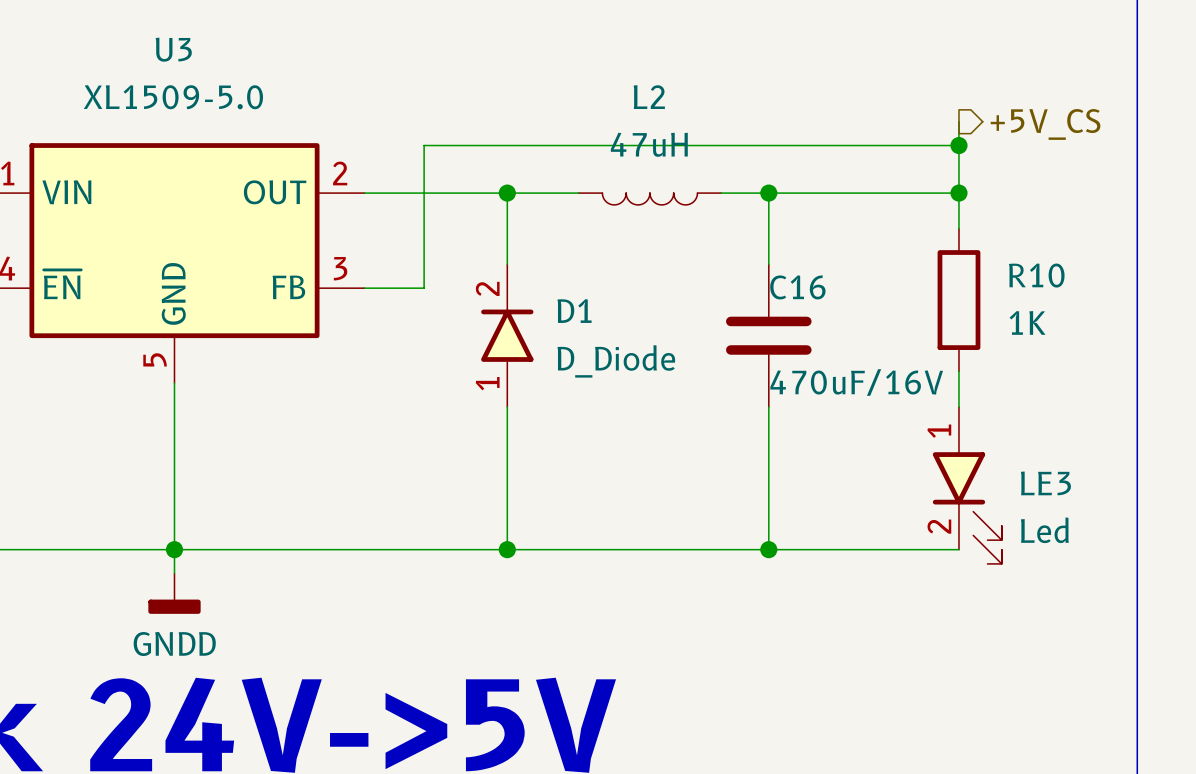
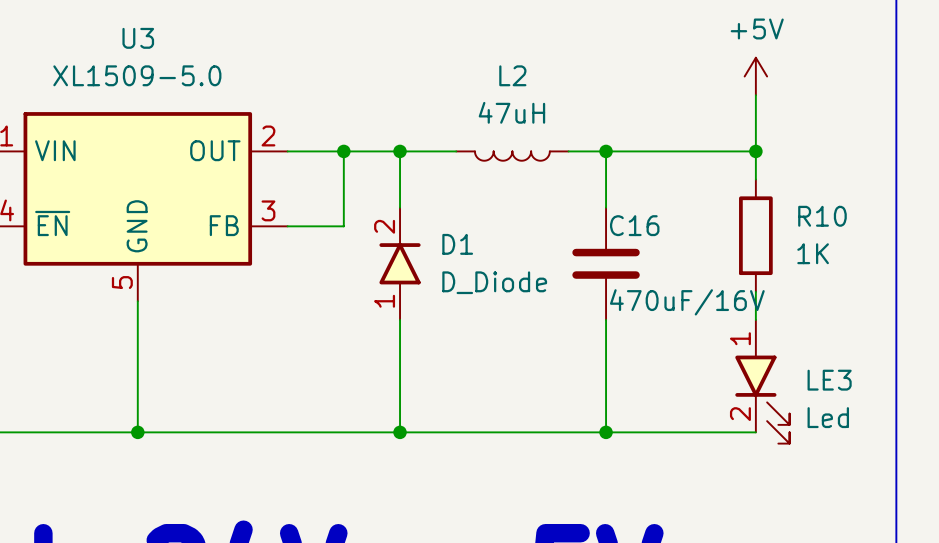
power symbol: none -> +5V (755, 76)
hierarchical label: +5V_CS (1045, 124) -> none
wire: (958, 145) (424, 145) (424, 288) -> (343, 151) (343, 226) (334, 226)
junction: (958, 145) -> none
junction: none -> (343, 151)
wire: (174, 549) (174, 573) -> none
power symbol: GNDD (174, 593) -> none

